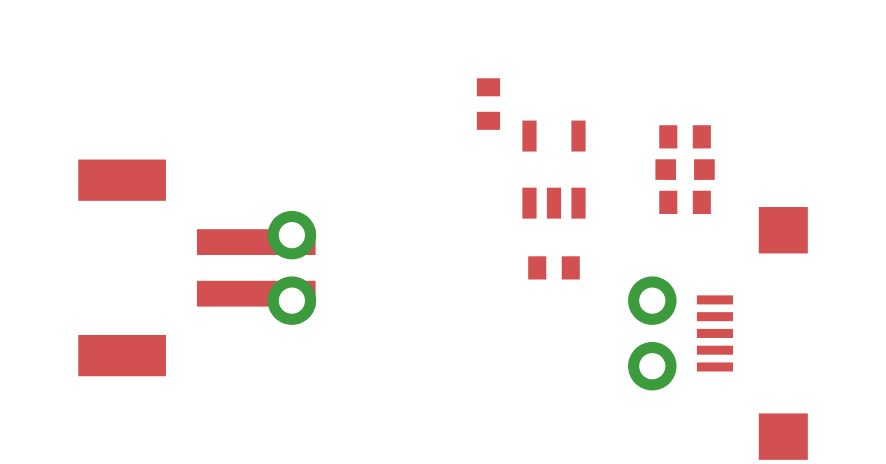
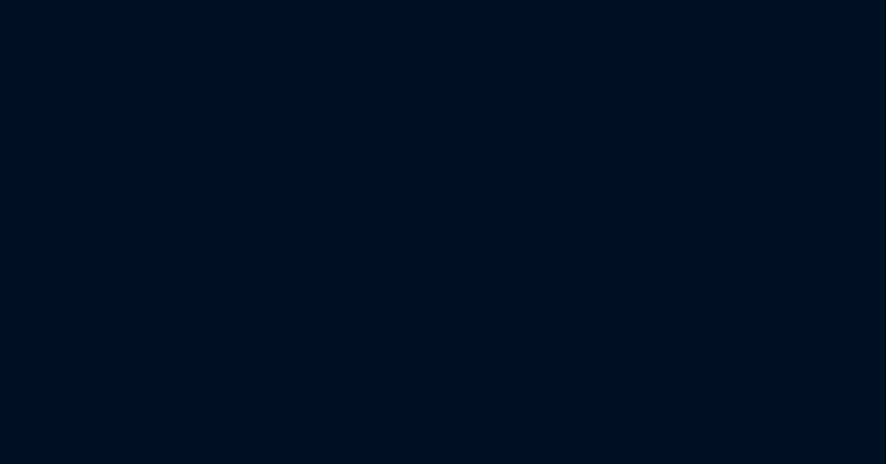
part: (488, 104) -> none
part: (685, 136) -> none
part: (553, 169) -> none
part: (685, 169) -> none
part: (685, 202) -> none
part: (196, 267) -> none
part: (291, 267) -> none
part: (553, 267) -> none
part: (652, 333) -> none
part: (752, 333) -> none

